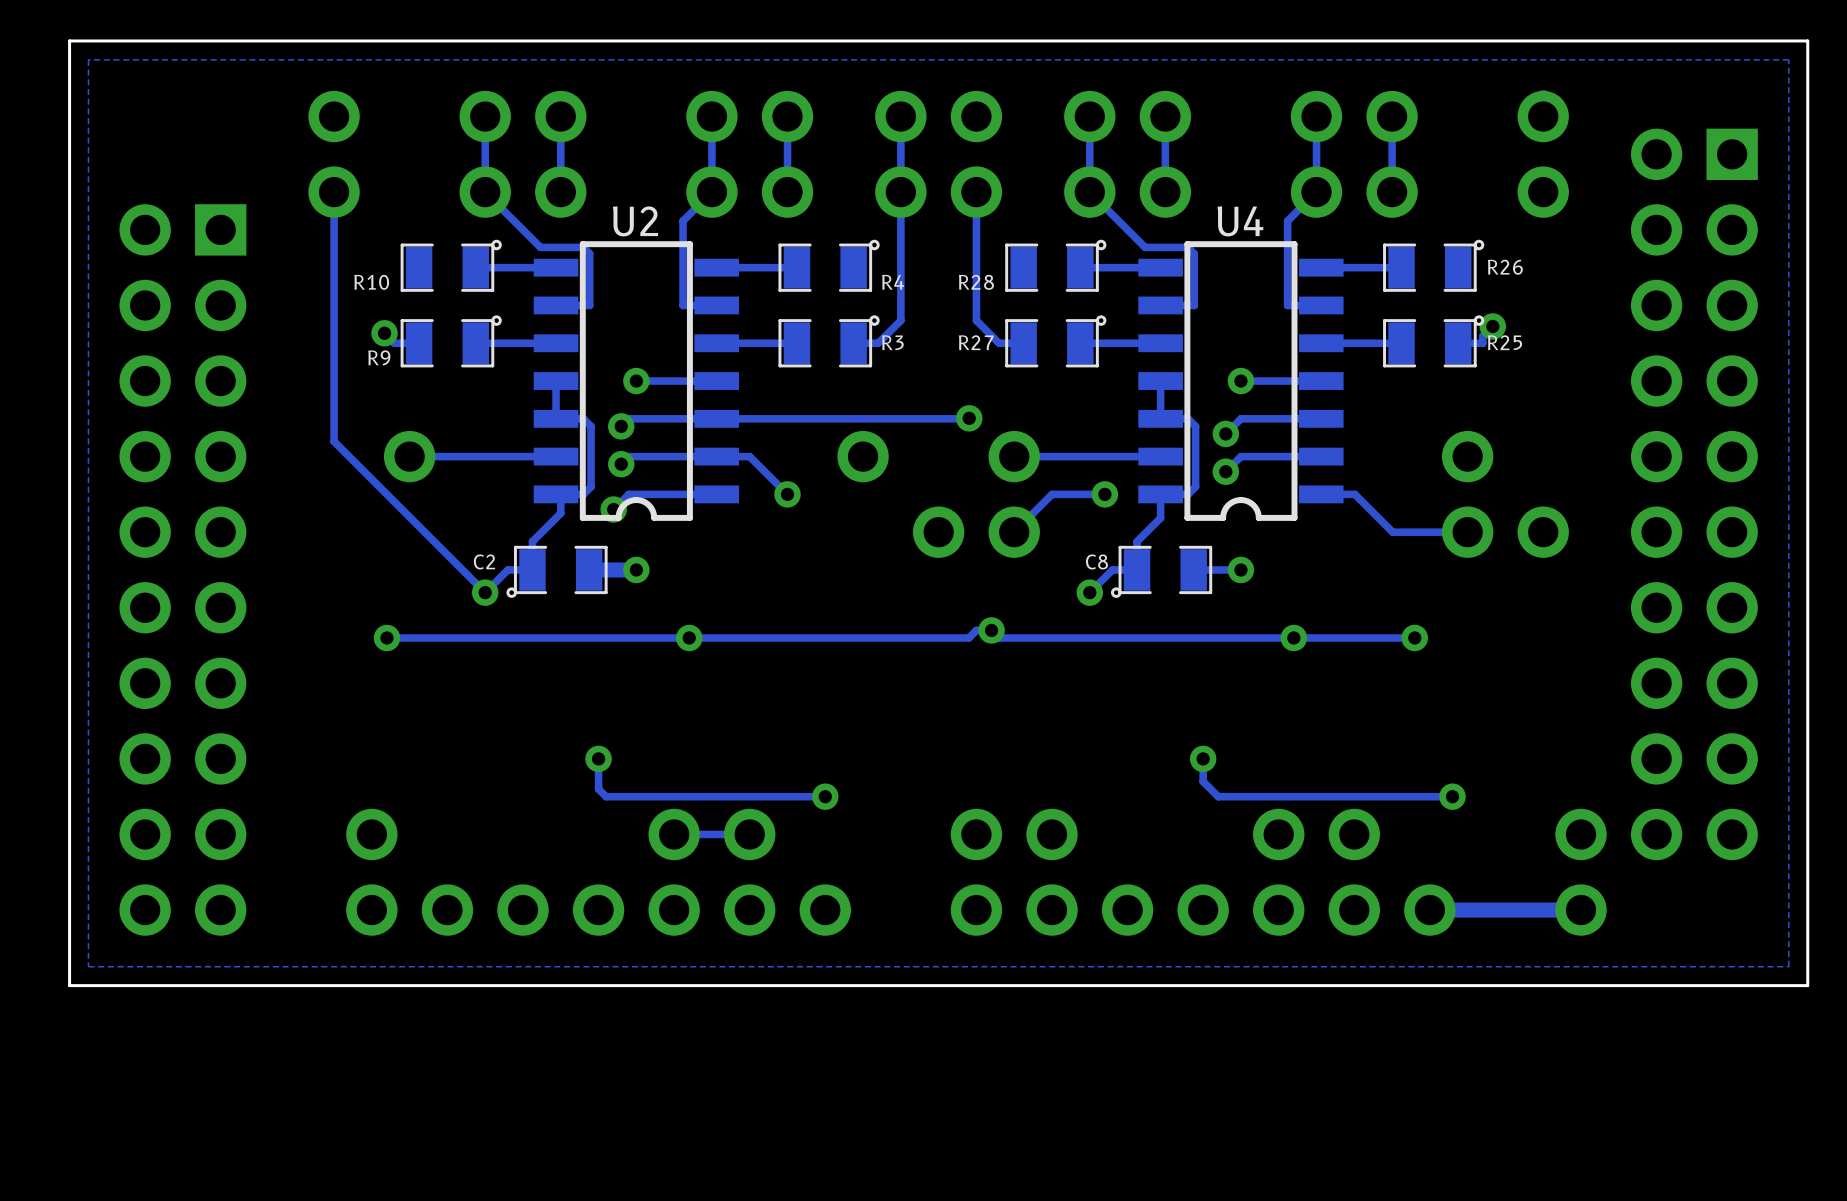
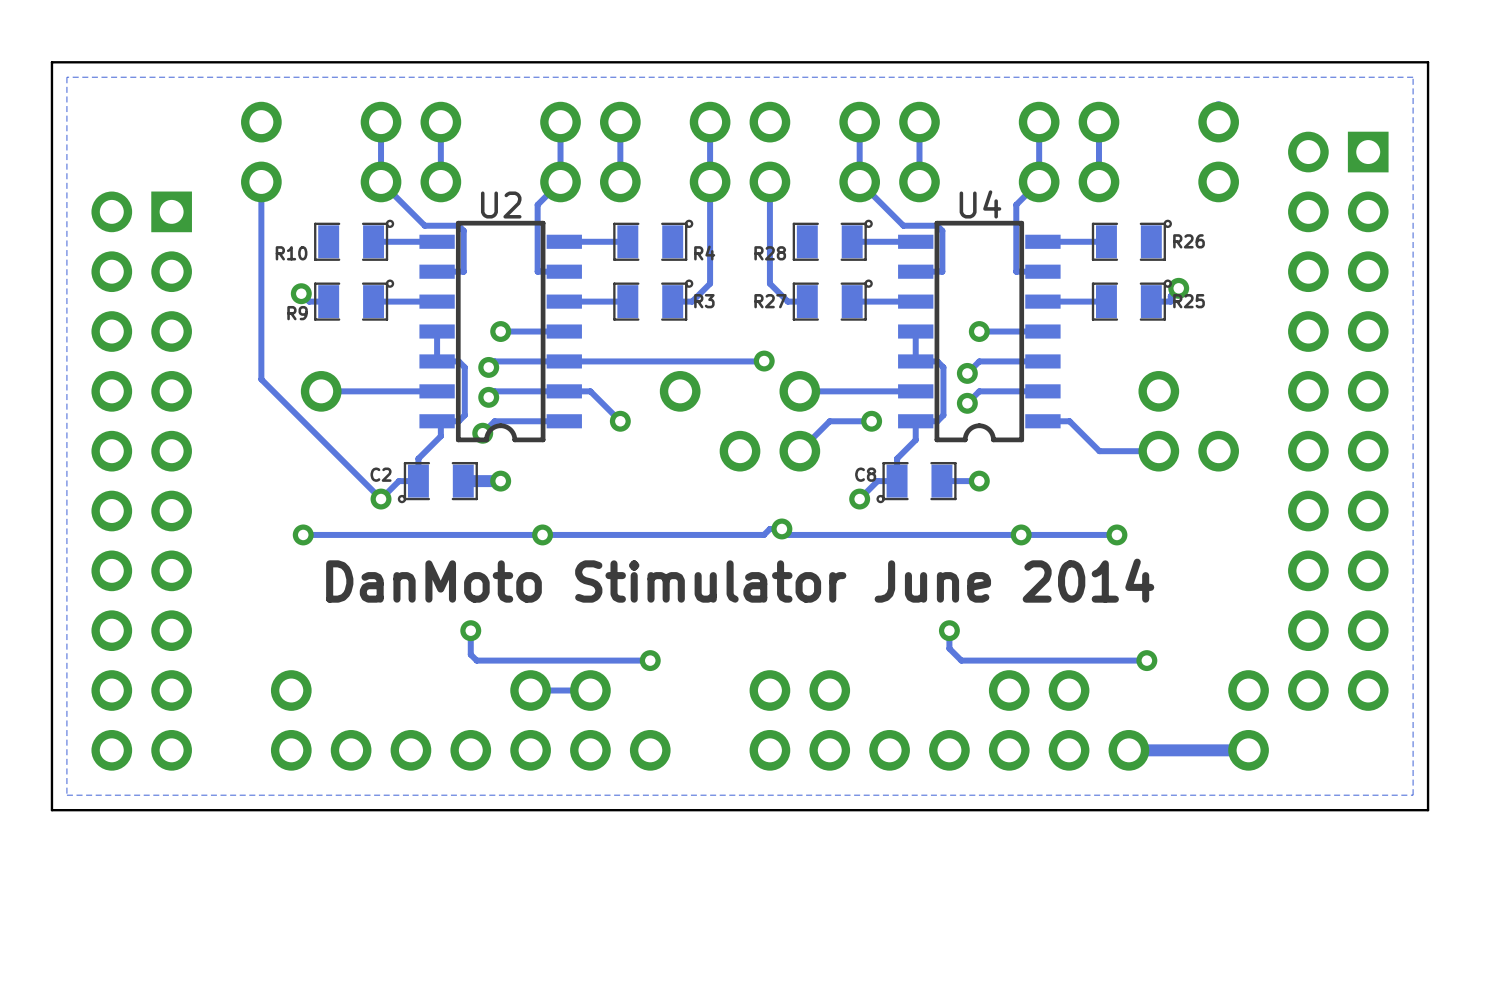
text: none -> DanMoto Stimulator June 2014 (740, 580)

